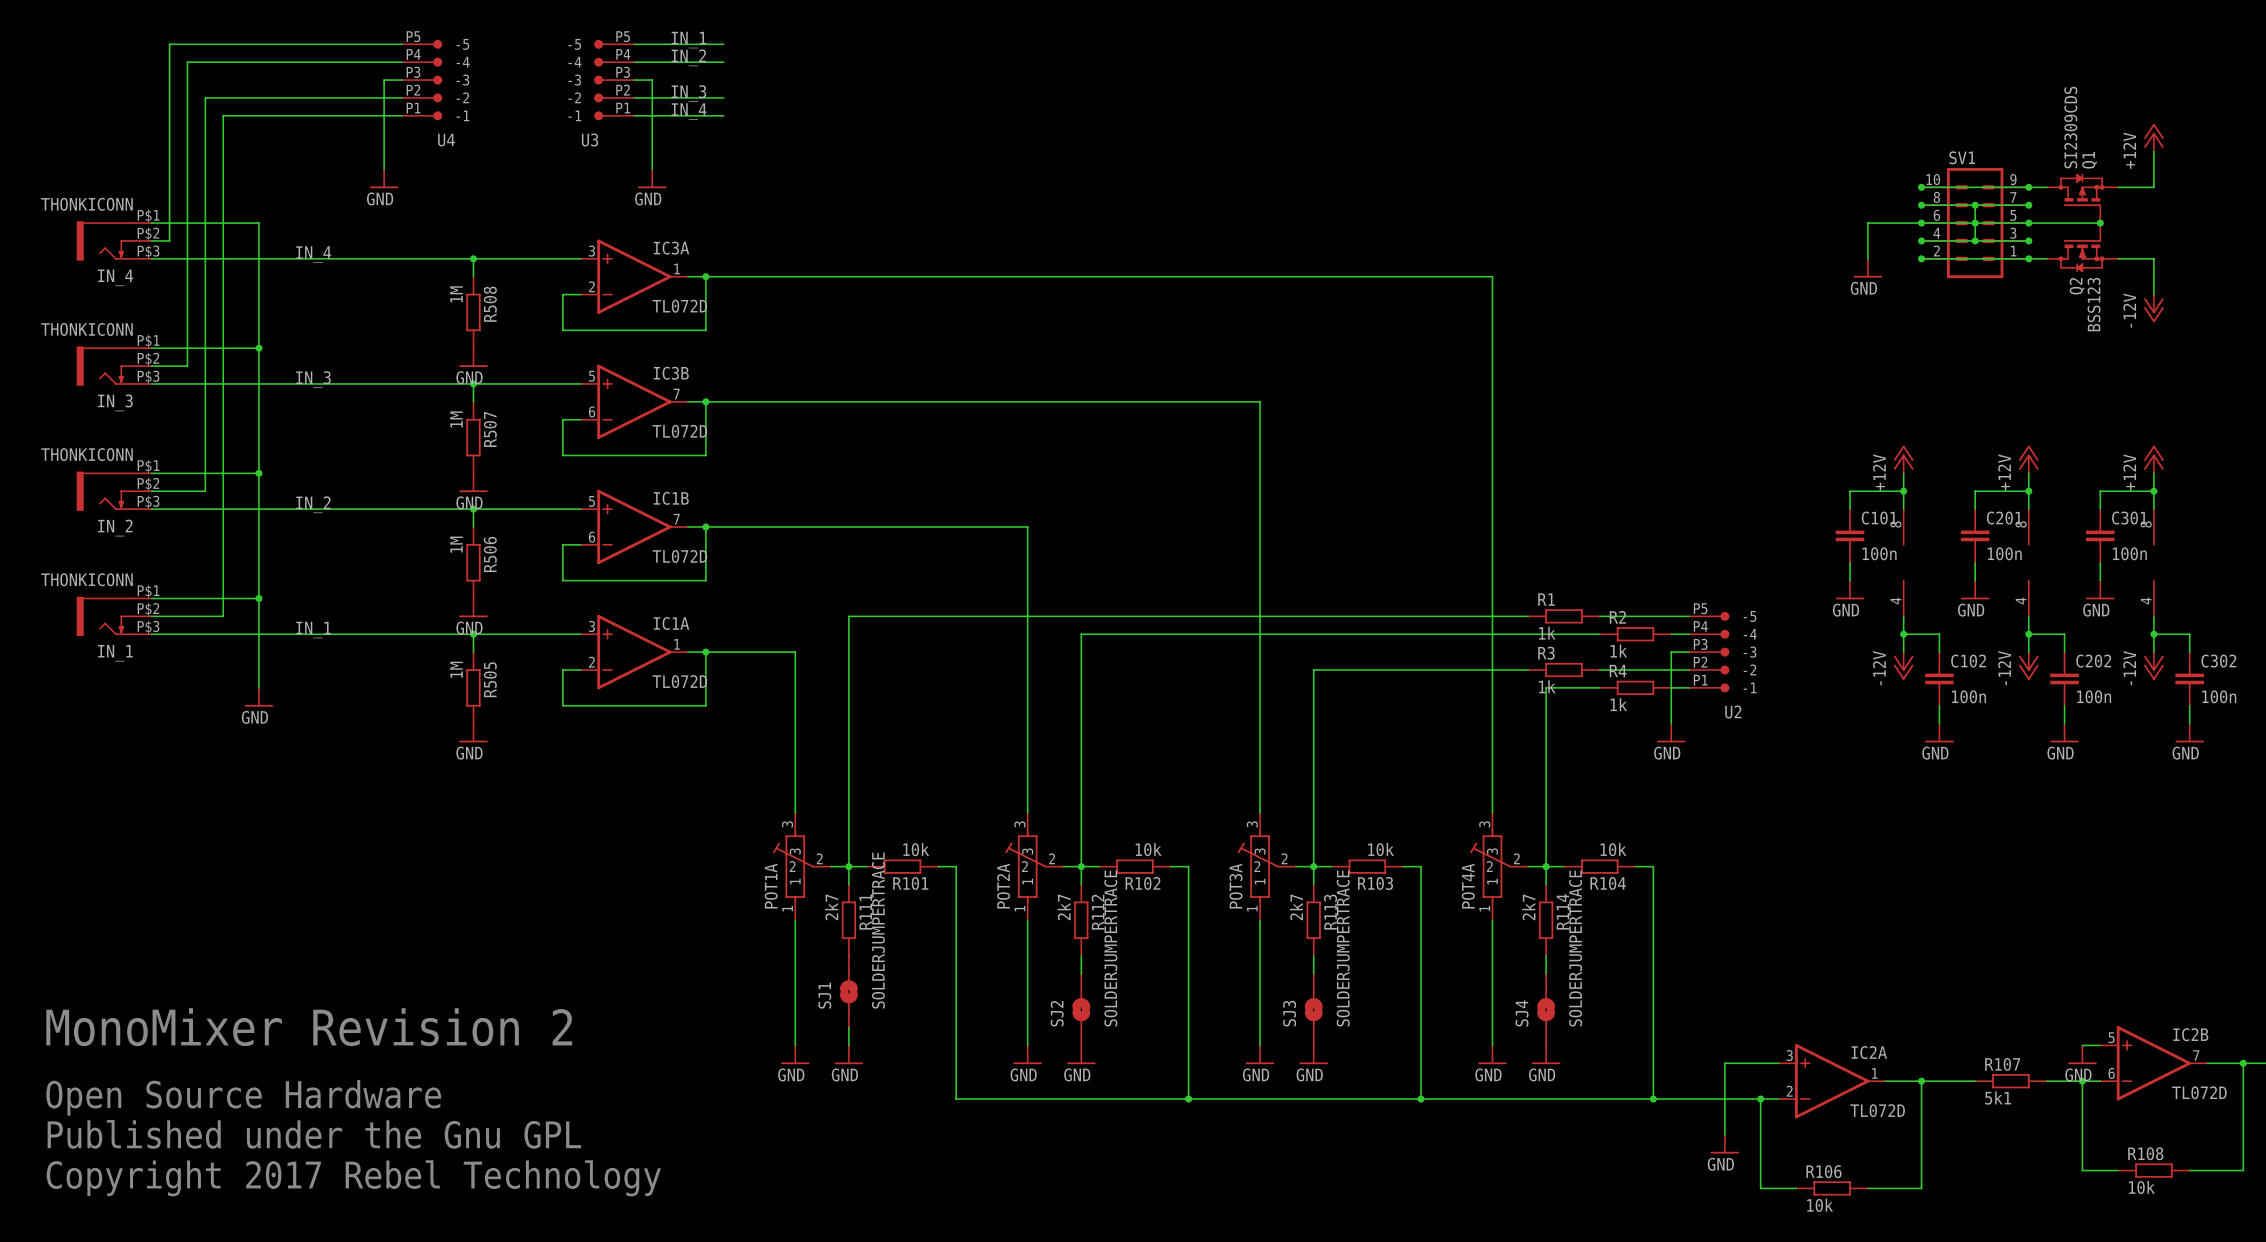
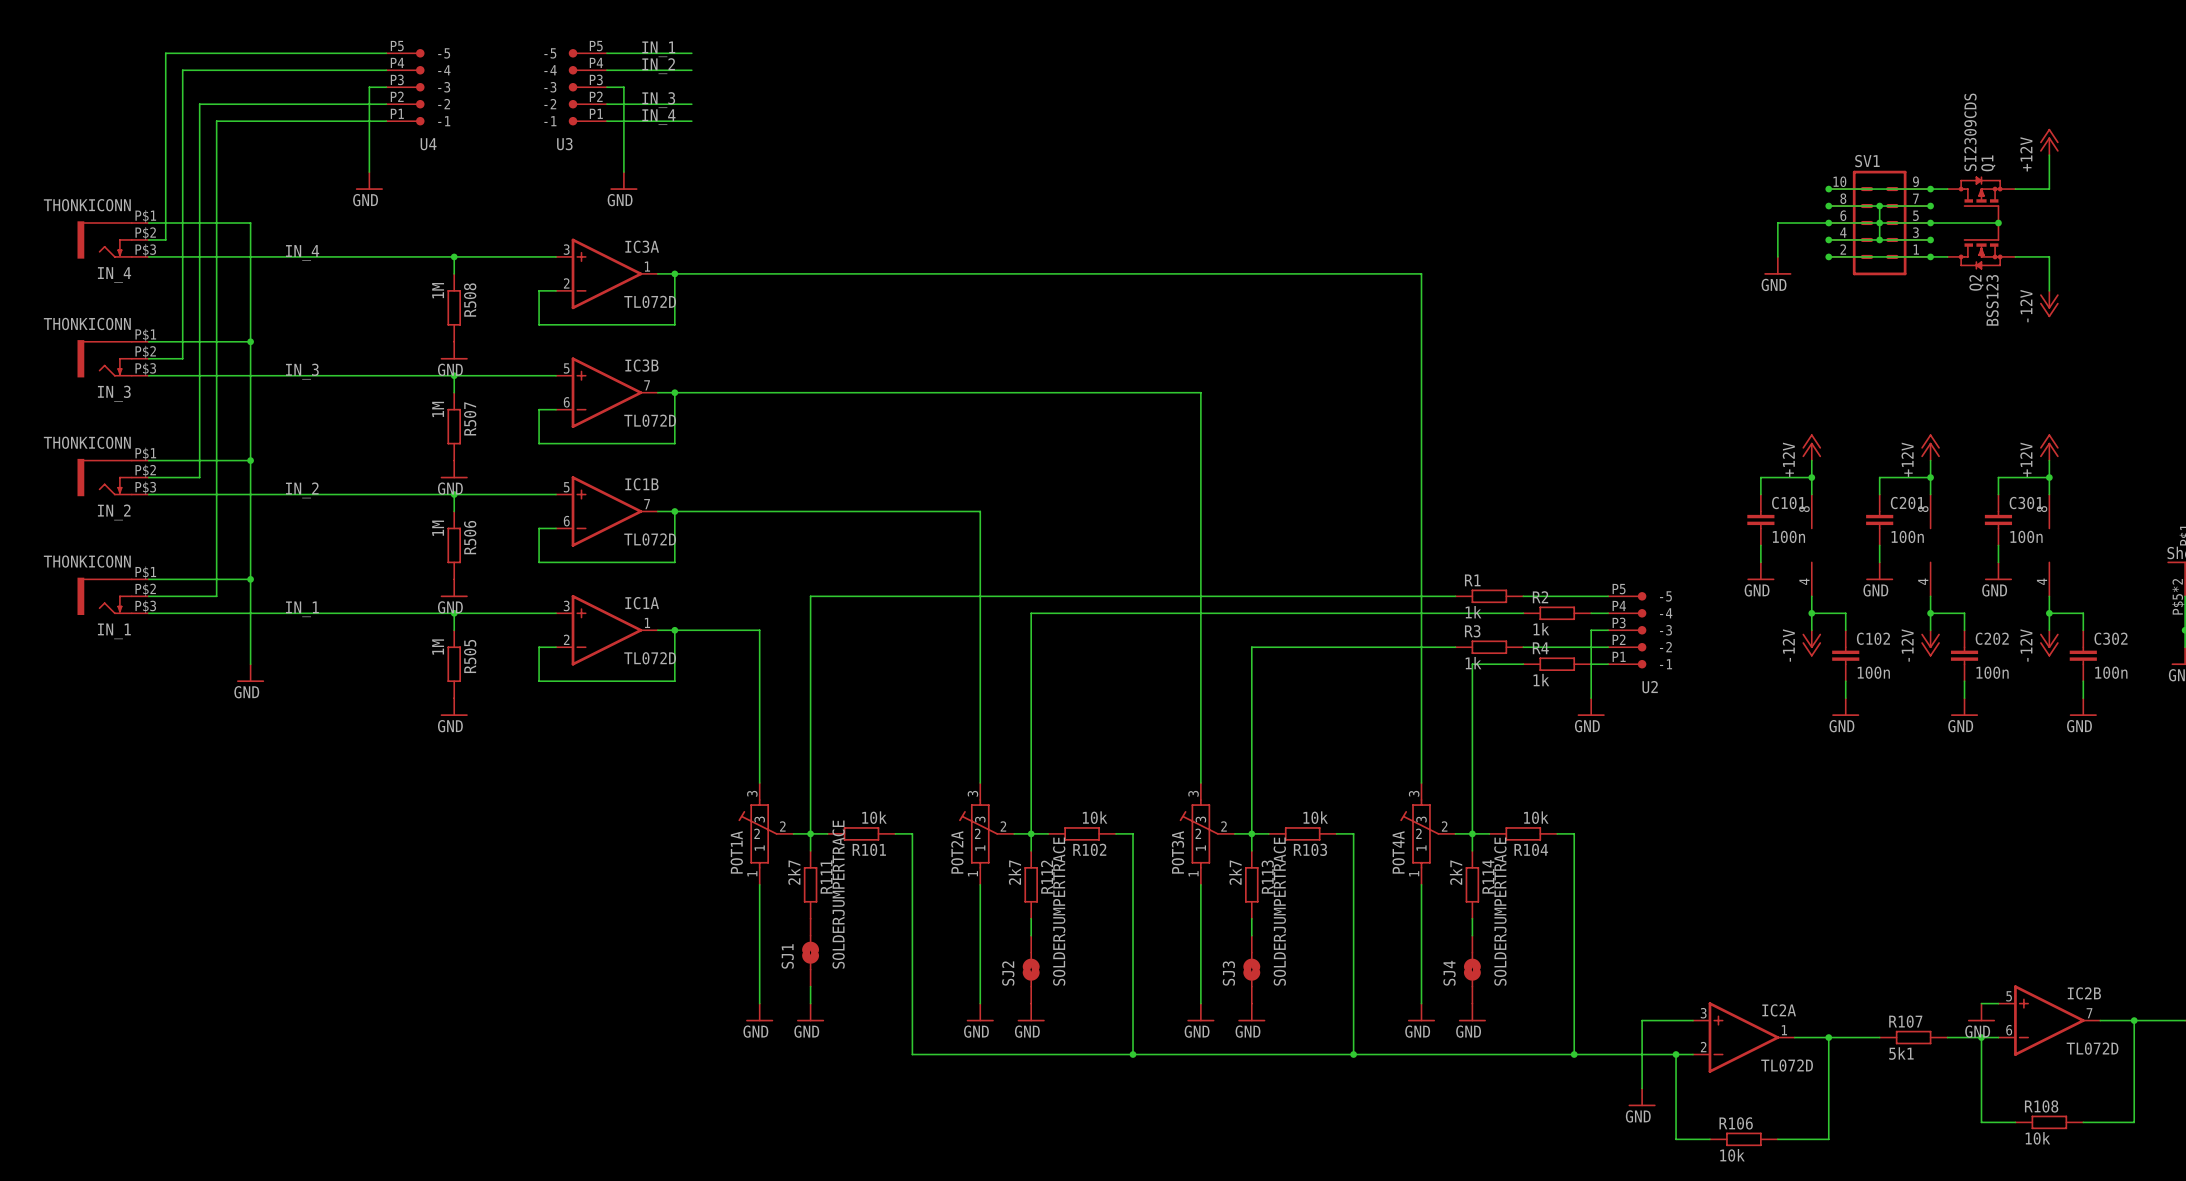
text: MonoMixer Revision 2 (309, 1027) -> none
text: Open Source Hardware (243, 1097) -> none
text: Published under the Gnu GPL (314, 1134) -> none
text: Copyright 2017 Rebel Technology (353, 1178) -> none

